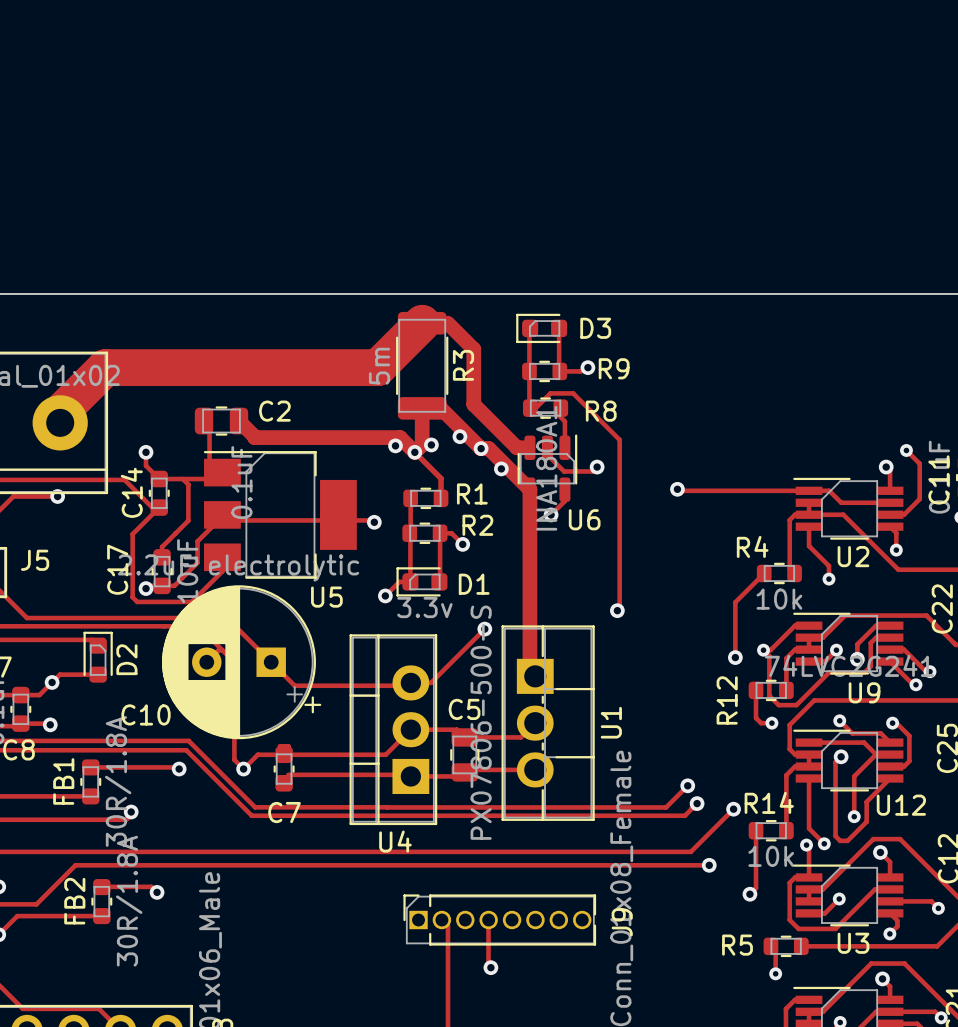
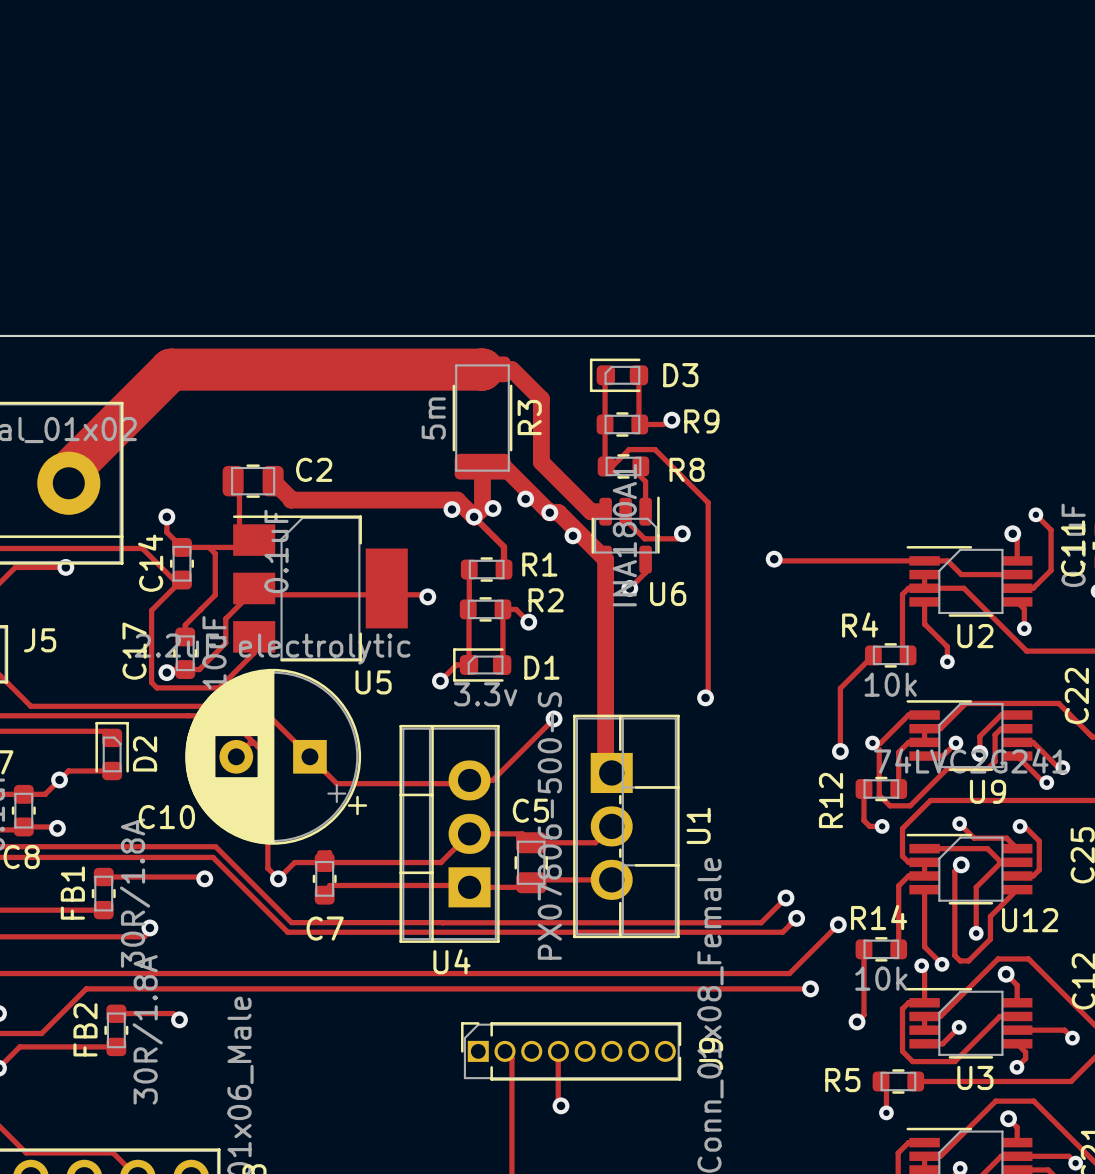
track: (421, 323) (377, 367) (105, 367) -> (482, 369) (171, 369) (120, 420)

